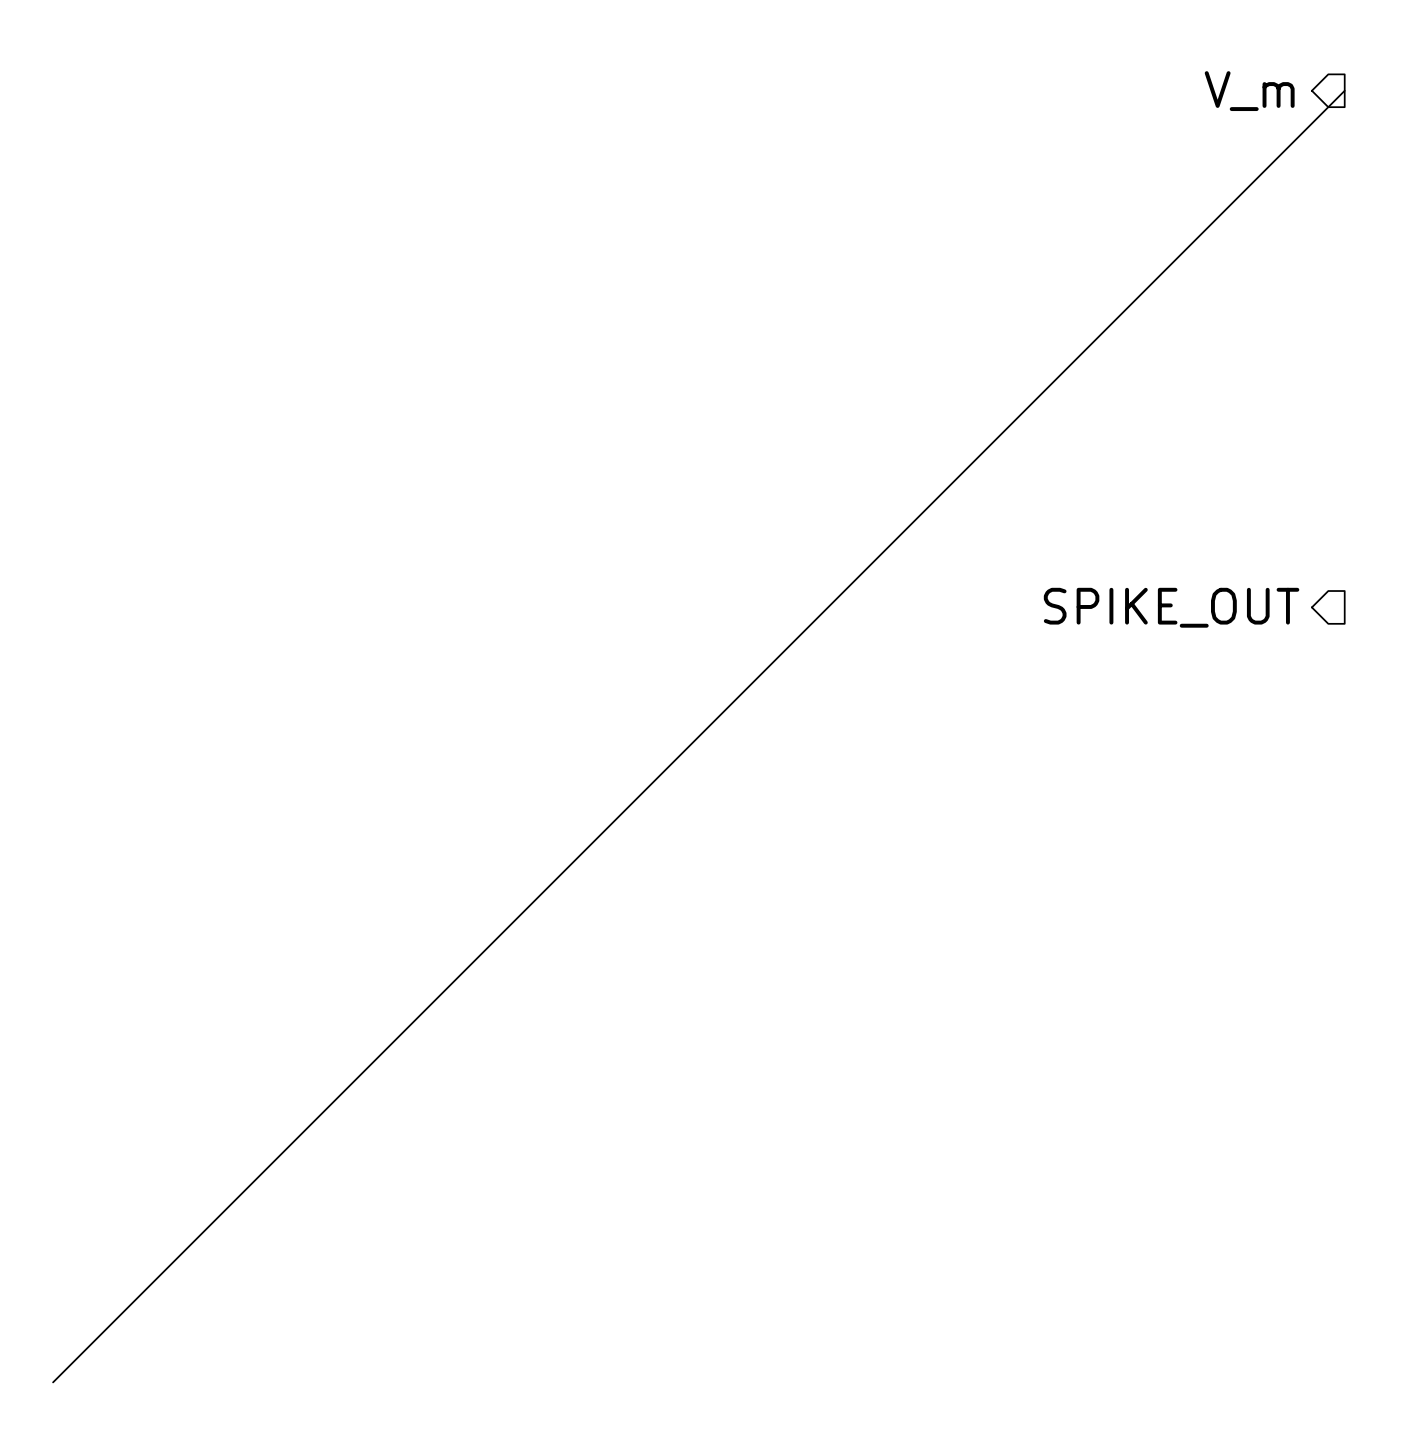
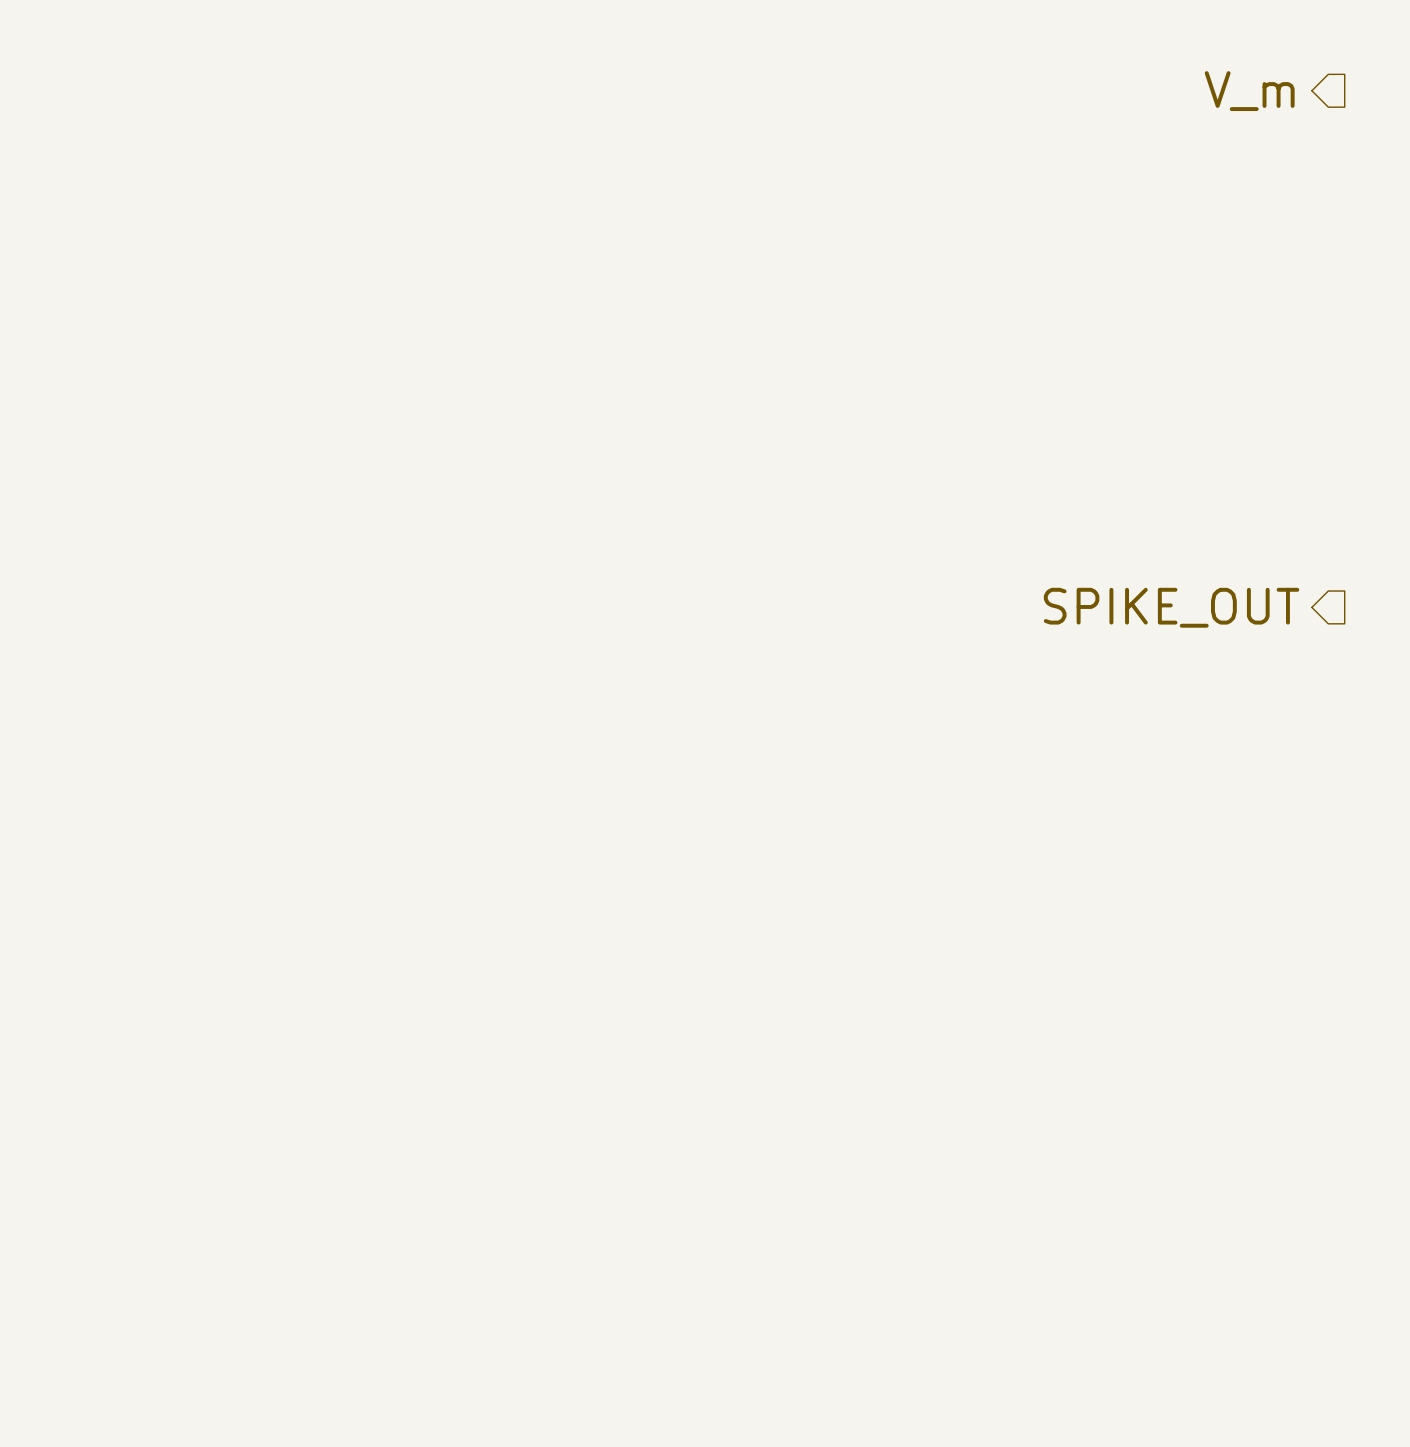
wire: (1344, 90) (53, 1382) -> none

